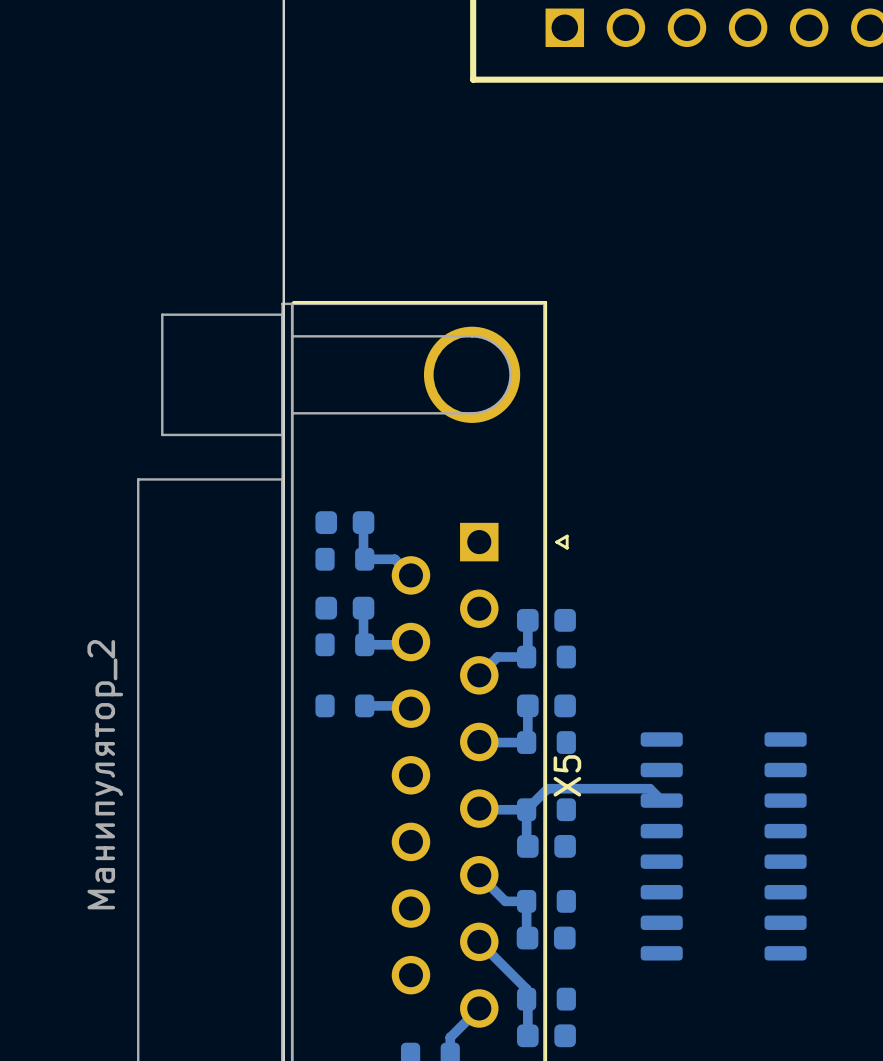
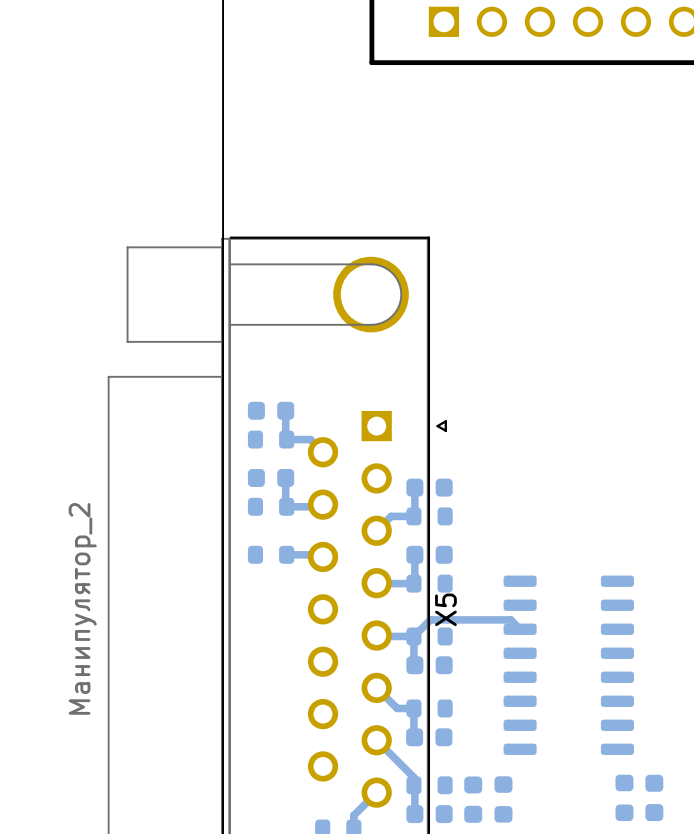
part: none -> (624, 797)
part: none -> (654, 797)
part: none -> (473, 799)
part: none -> (503, 799)

